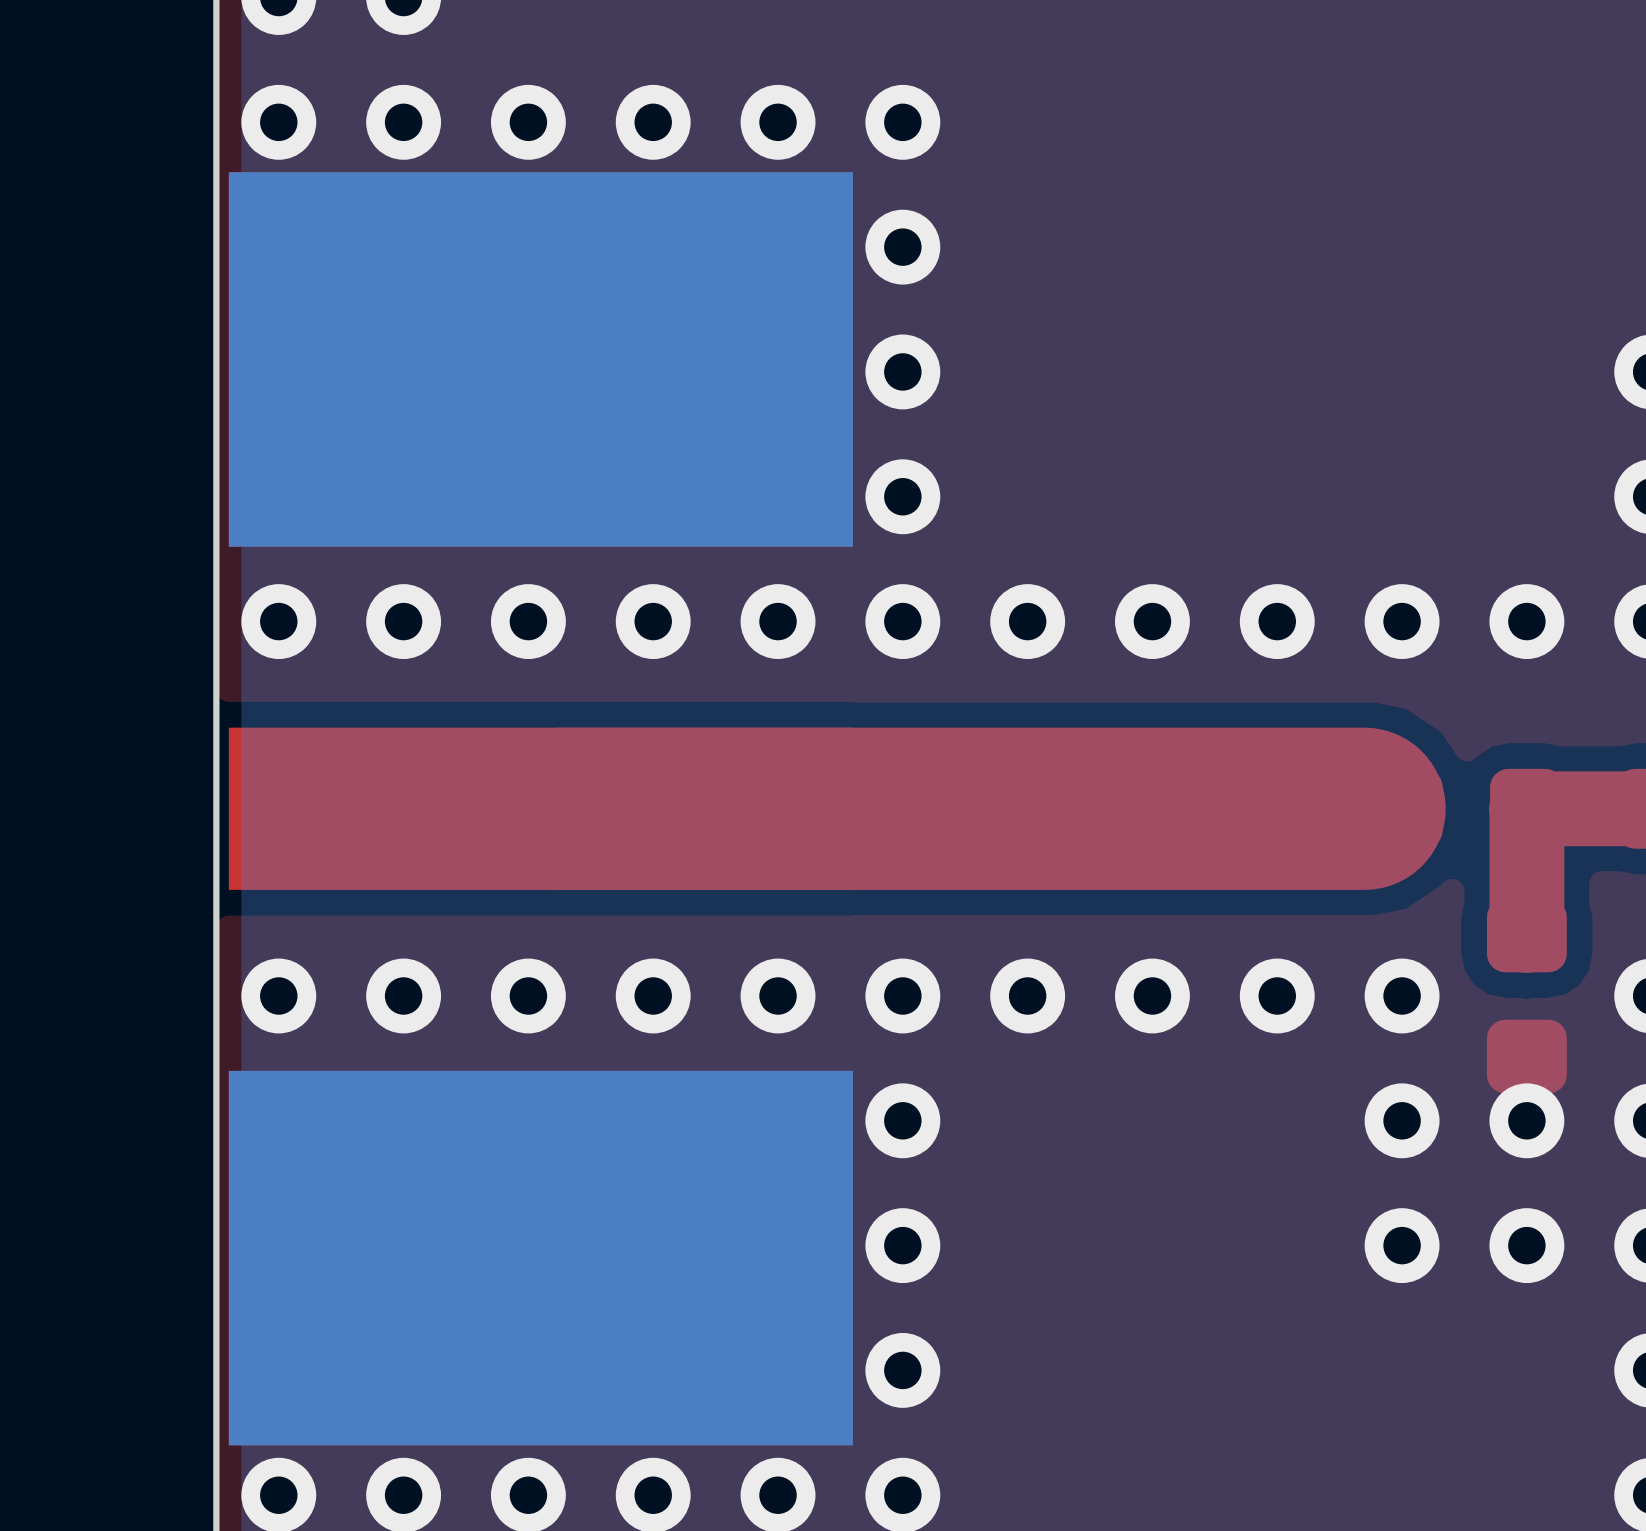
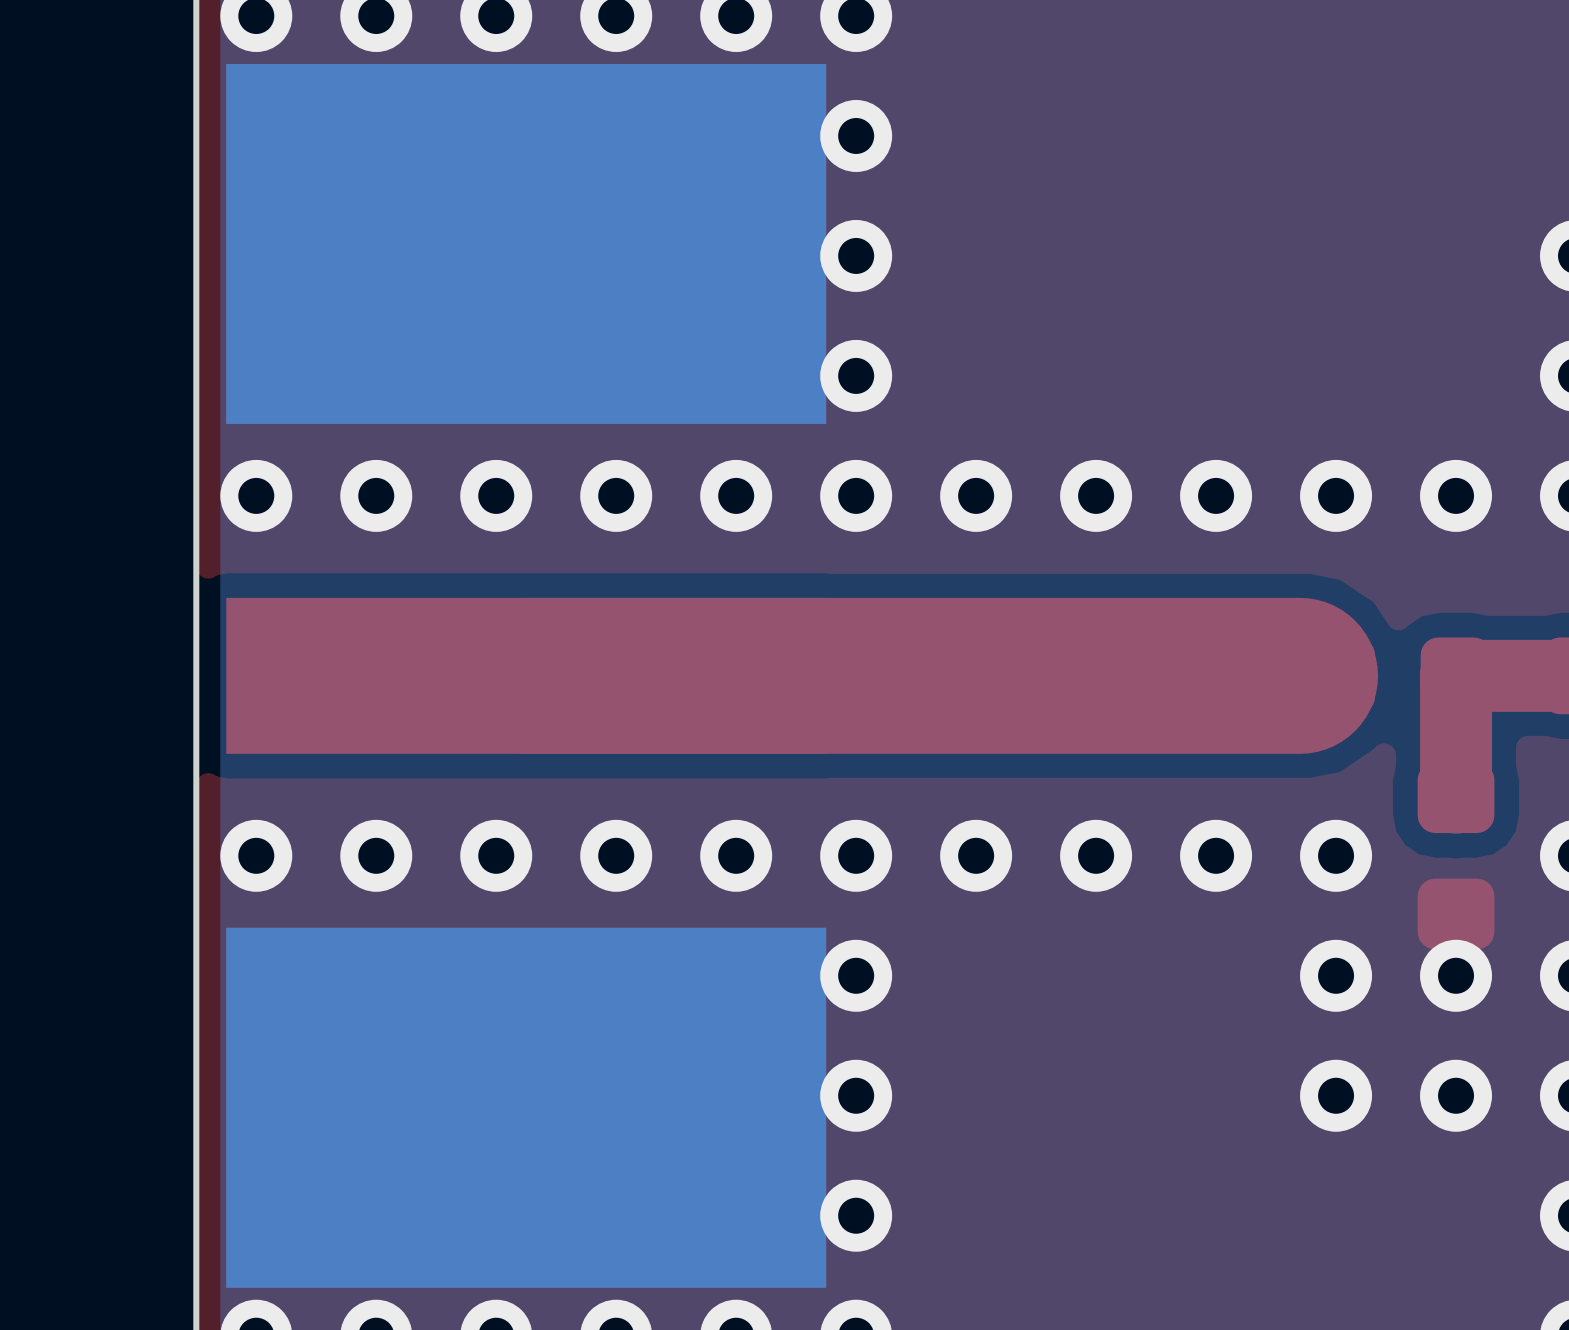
part position: (540, 808) -> (526, 675)

